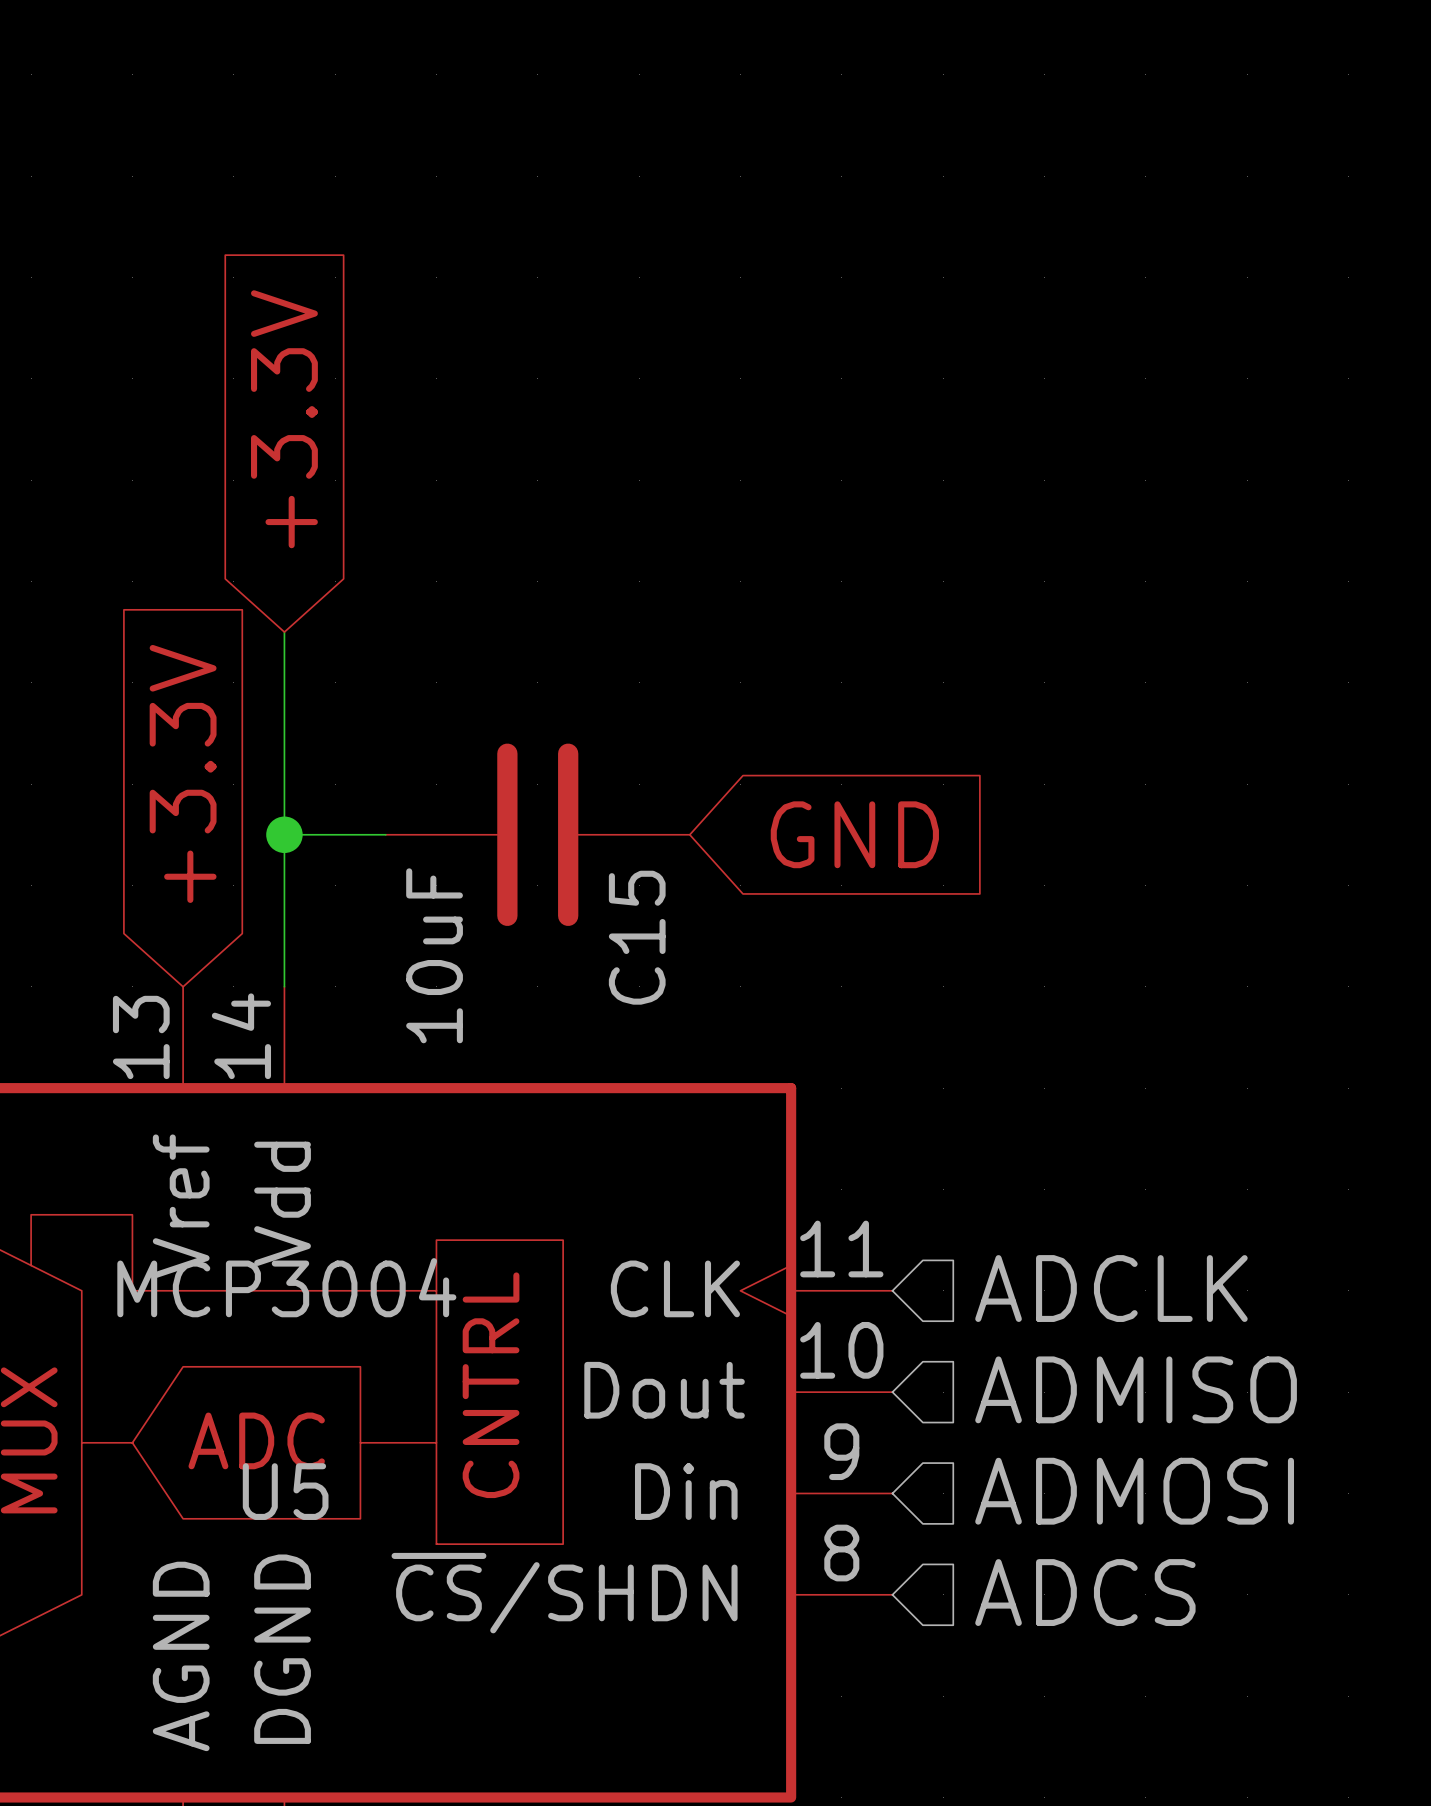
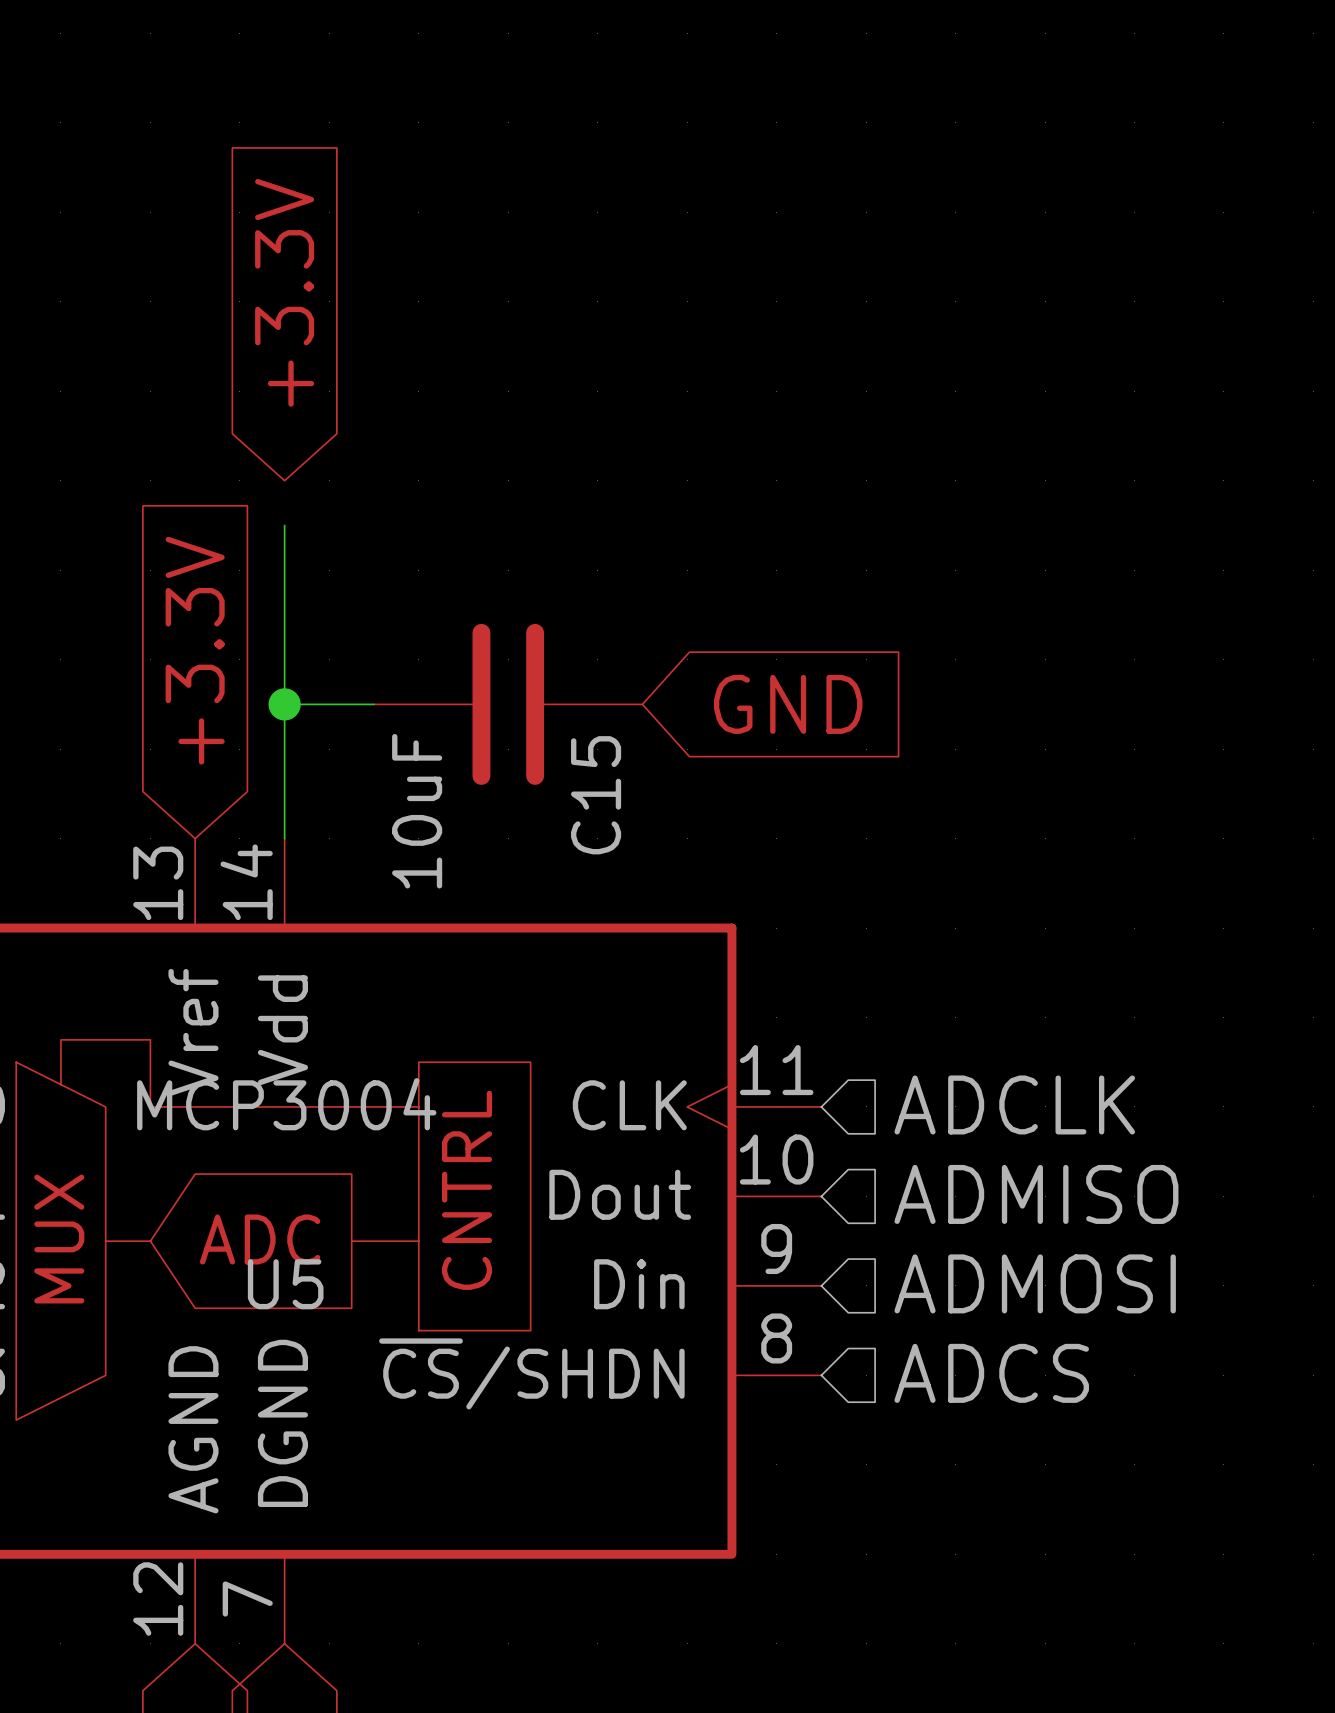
global label position: +3.3V (284, 419) -> +3.3V (284, 292)

